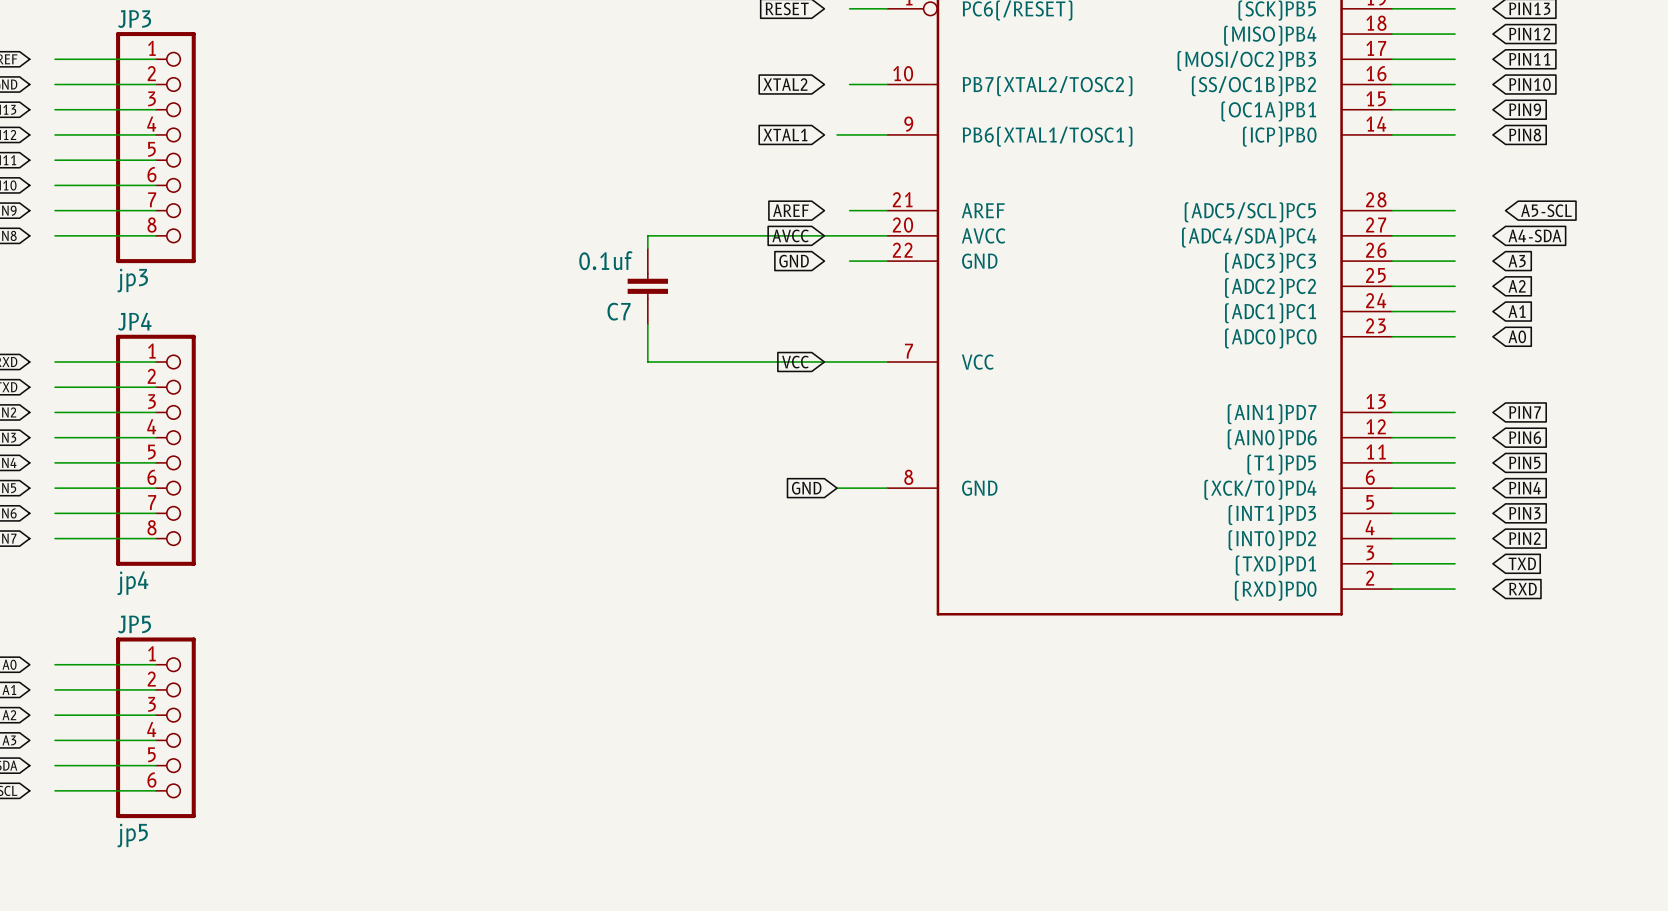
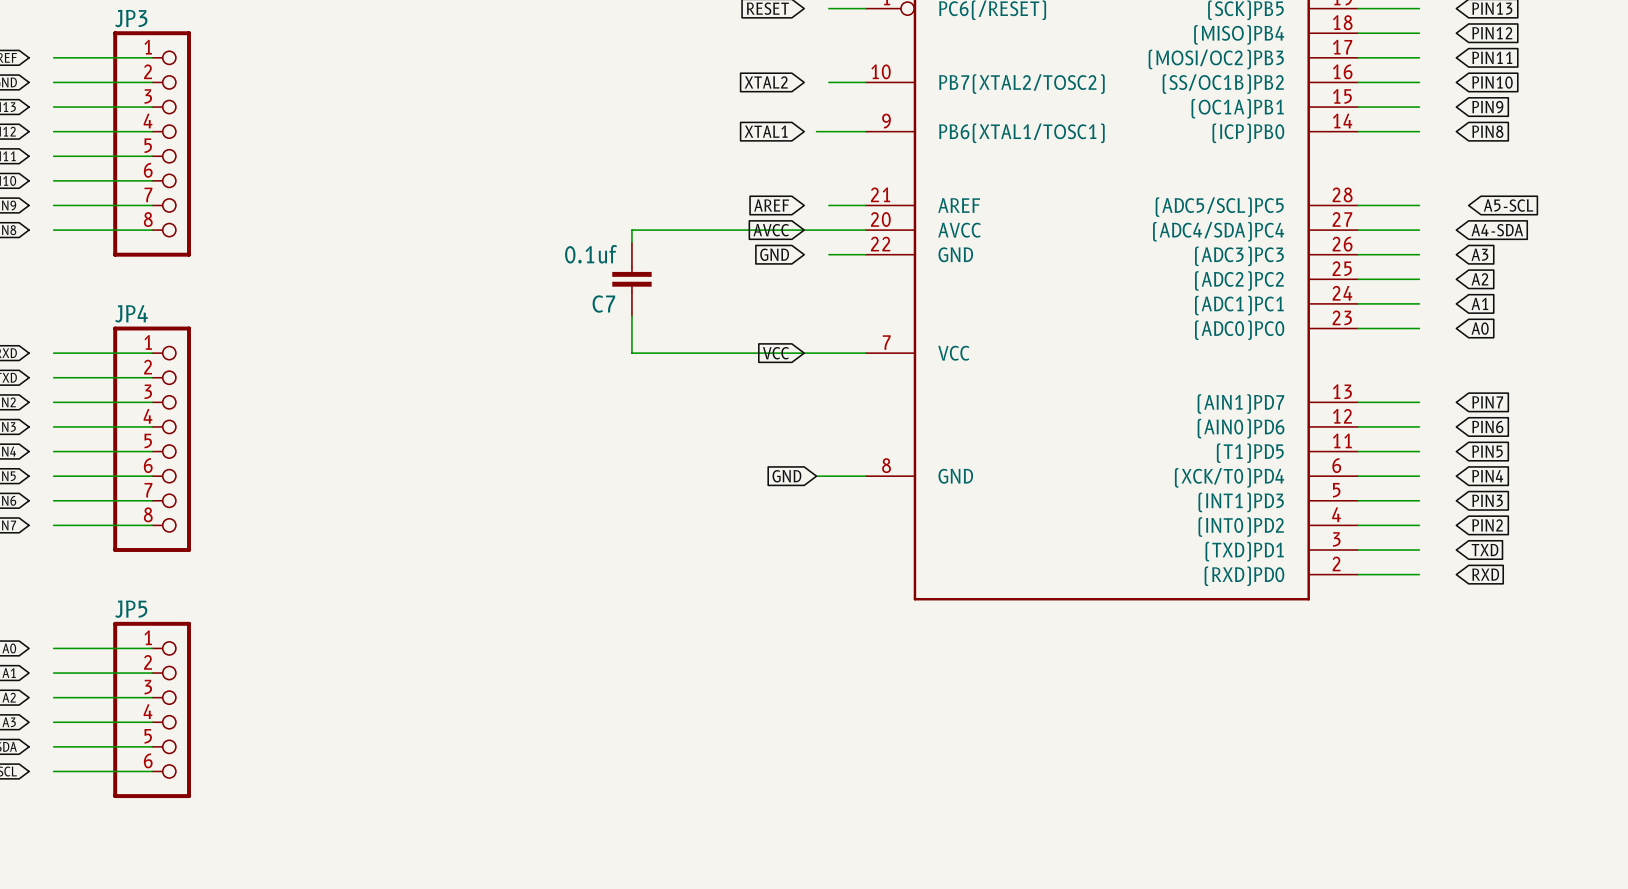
JP3 value: jp3 (132, 280) -> none
JP4 value: jp4 (132, 583) -> none
JP5 value: jp5 (132, 835) -> none

